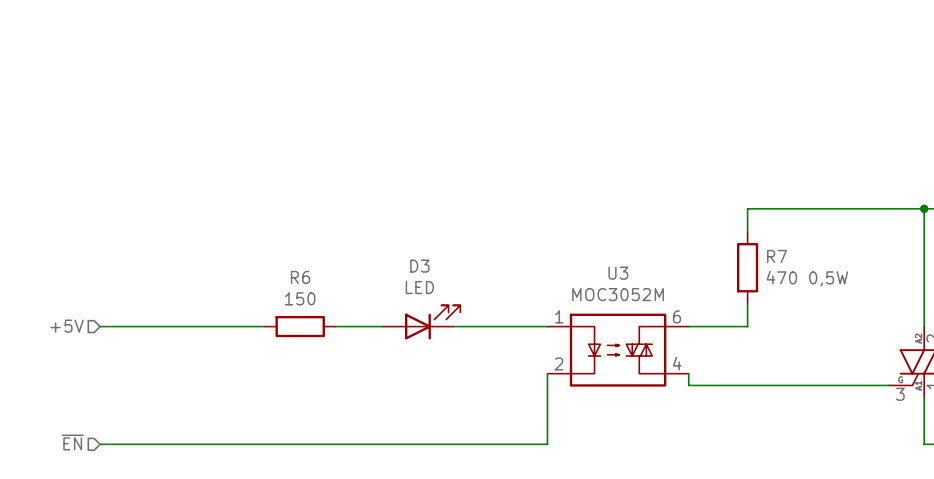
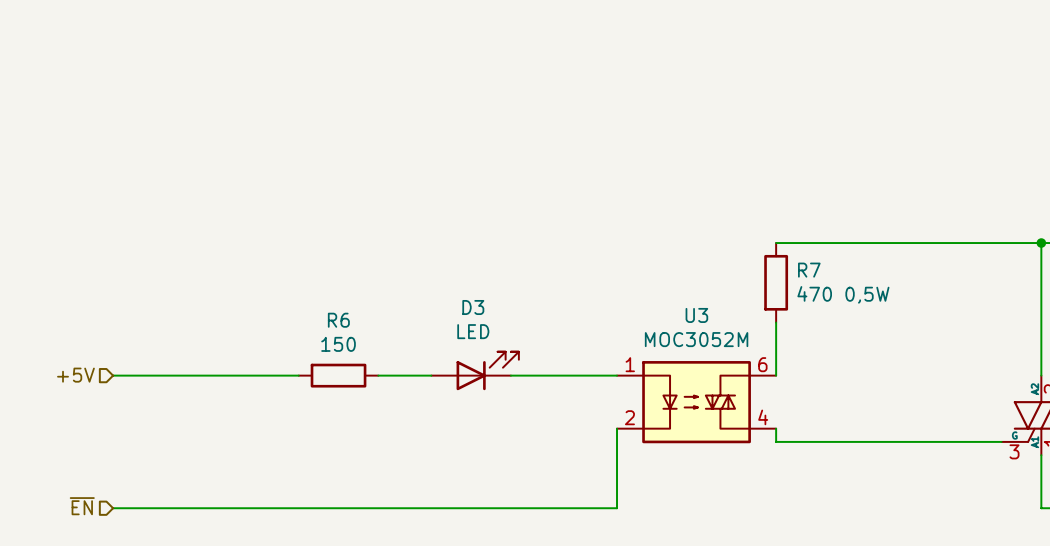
wire: (747, 208) (747, 232) -> (842, 243) (776, 243)
R7 position: (747, 267) -> (776, 282)
wire: (747, 303) (747, 326) (688, 326) -> (776, 322) (776, 375)

